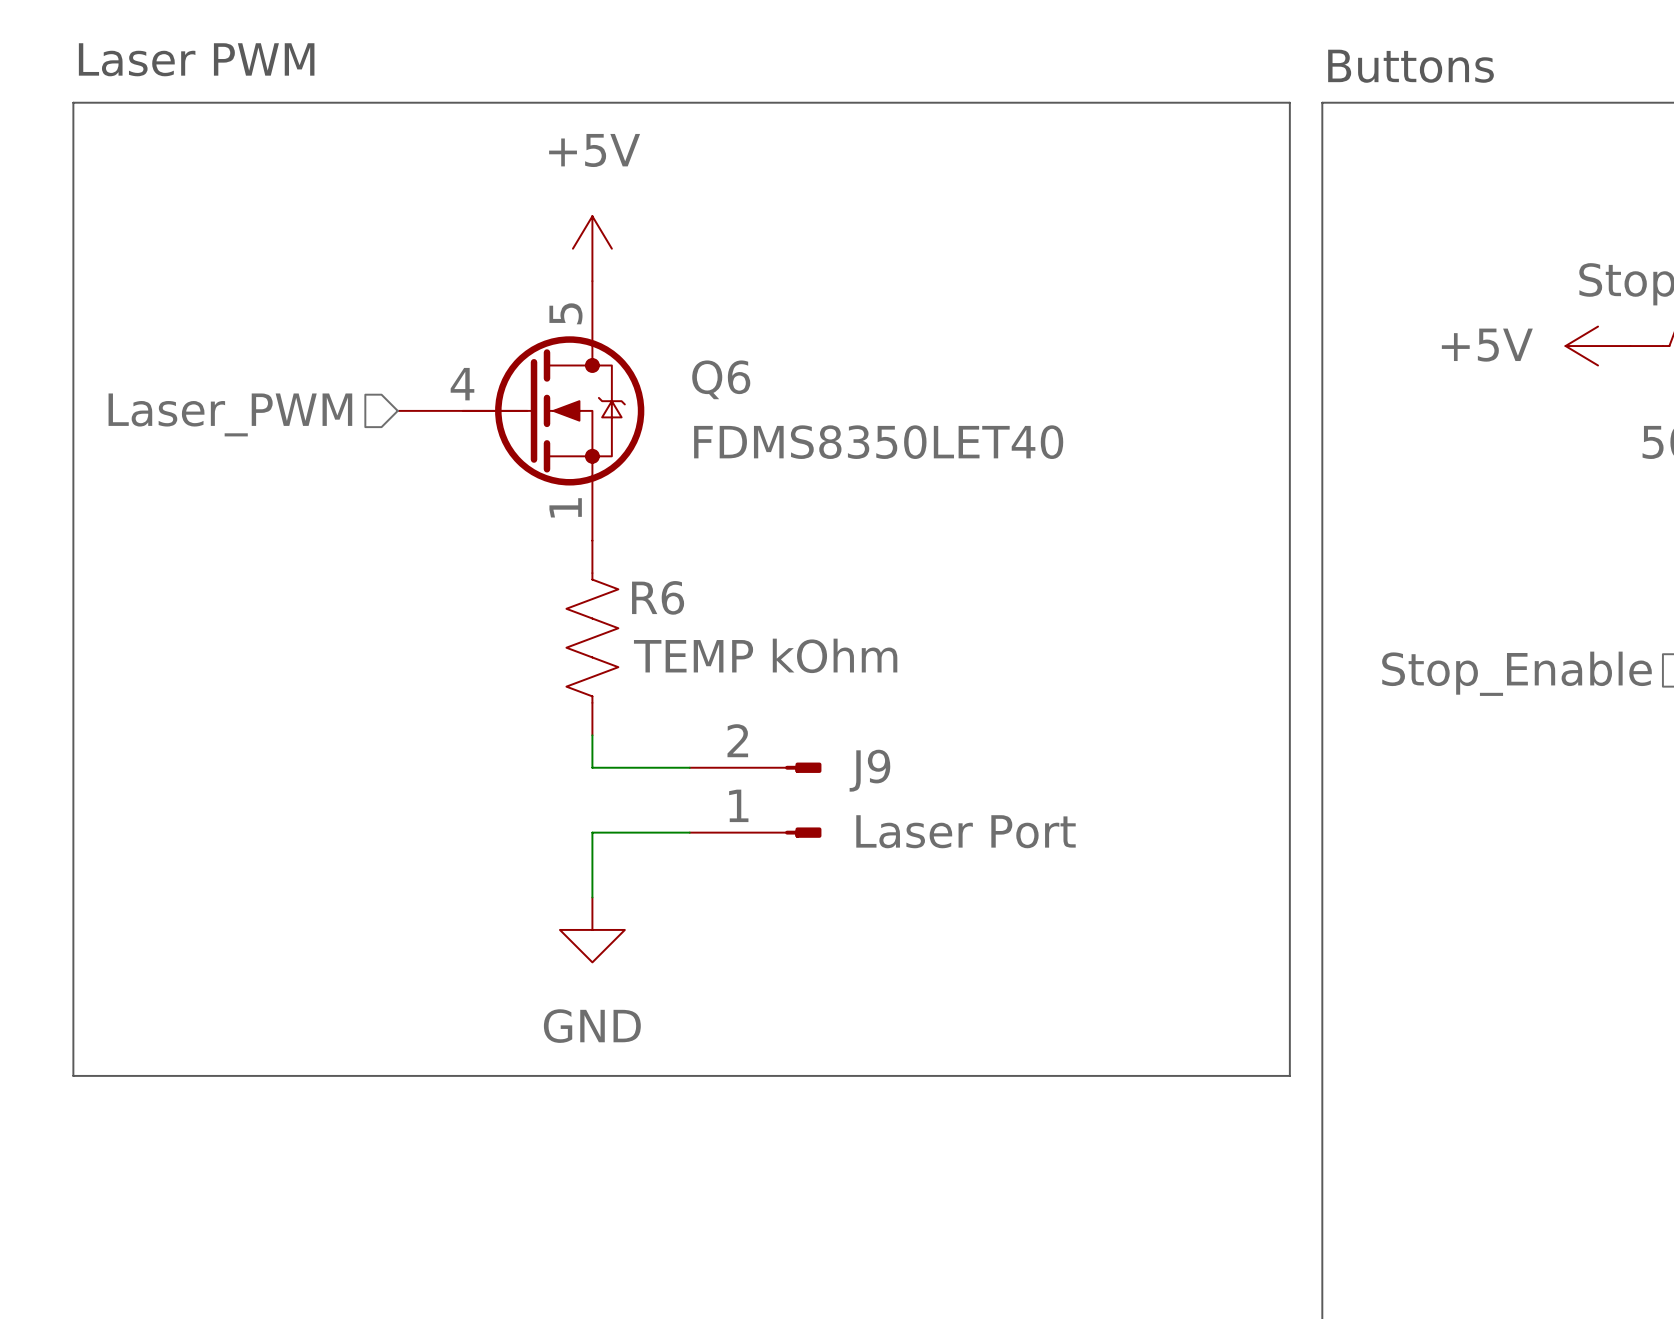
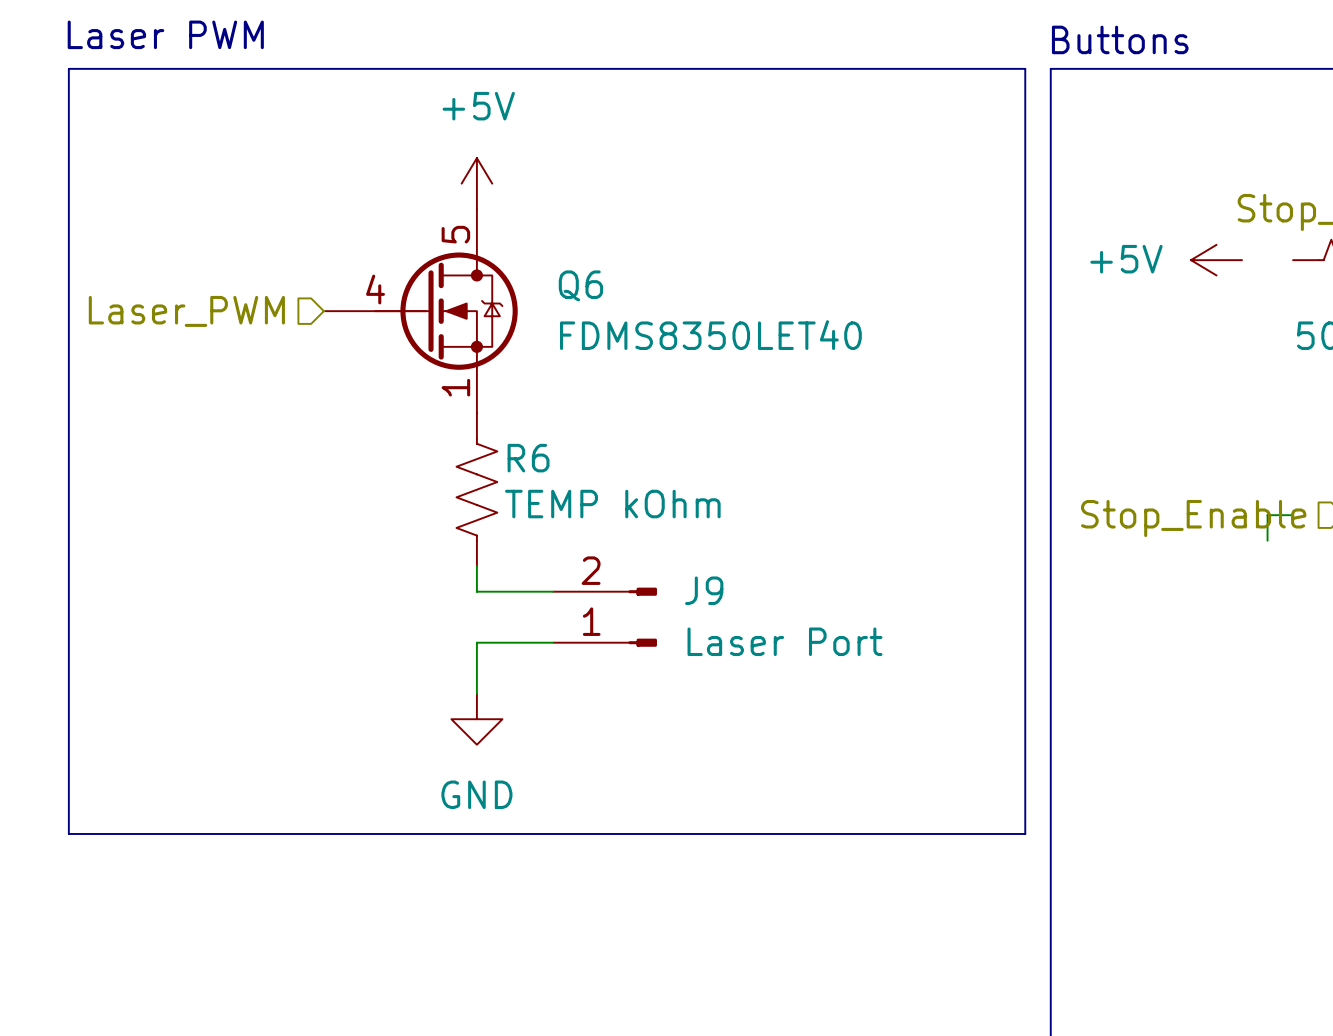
power symbol position: +5V (1598, 346) -> +5V (1216, 260)
wire: none -> (1293, 515) (1267, 515) (1267, 540)

